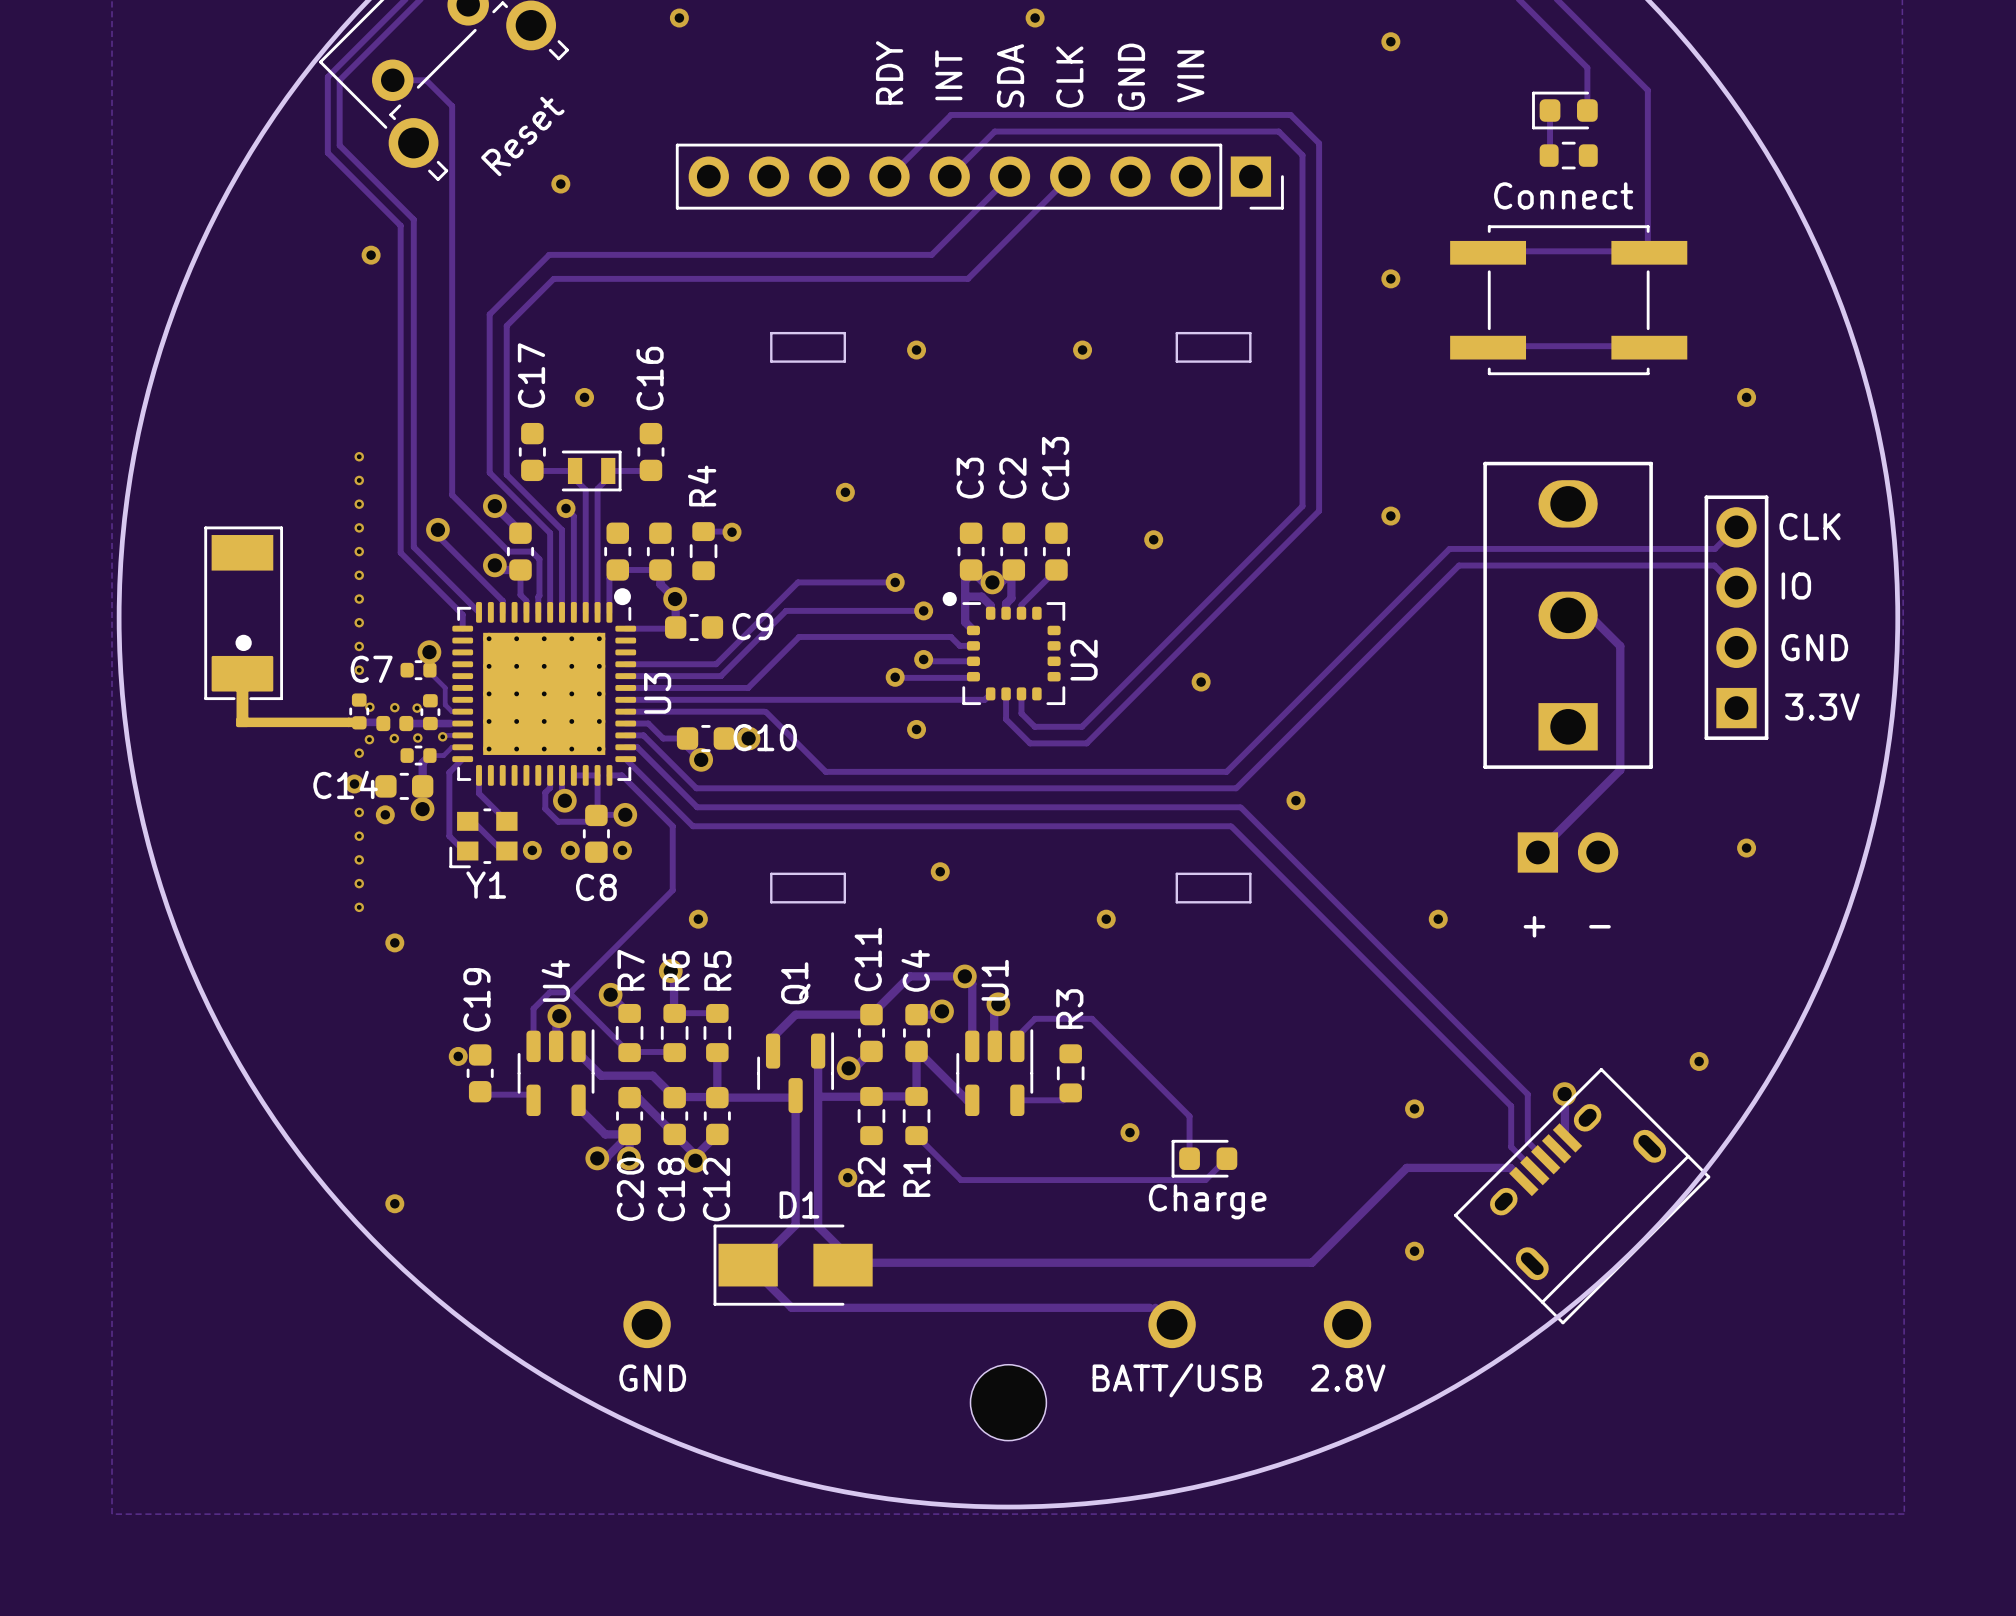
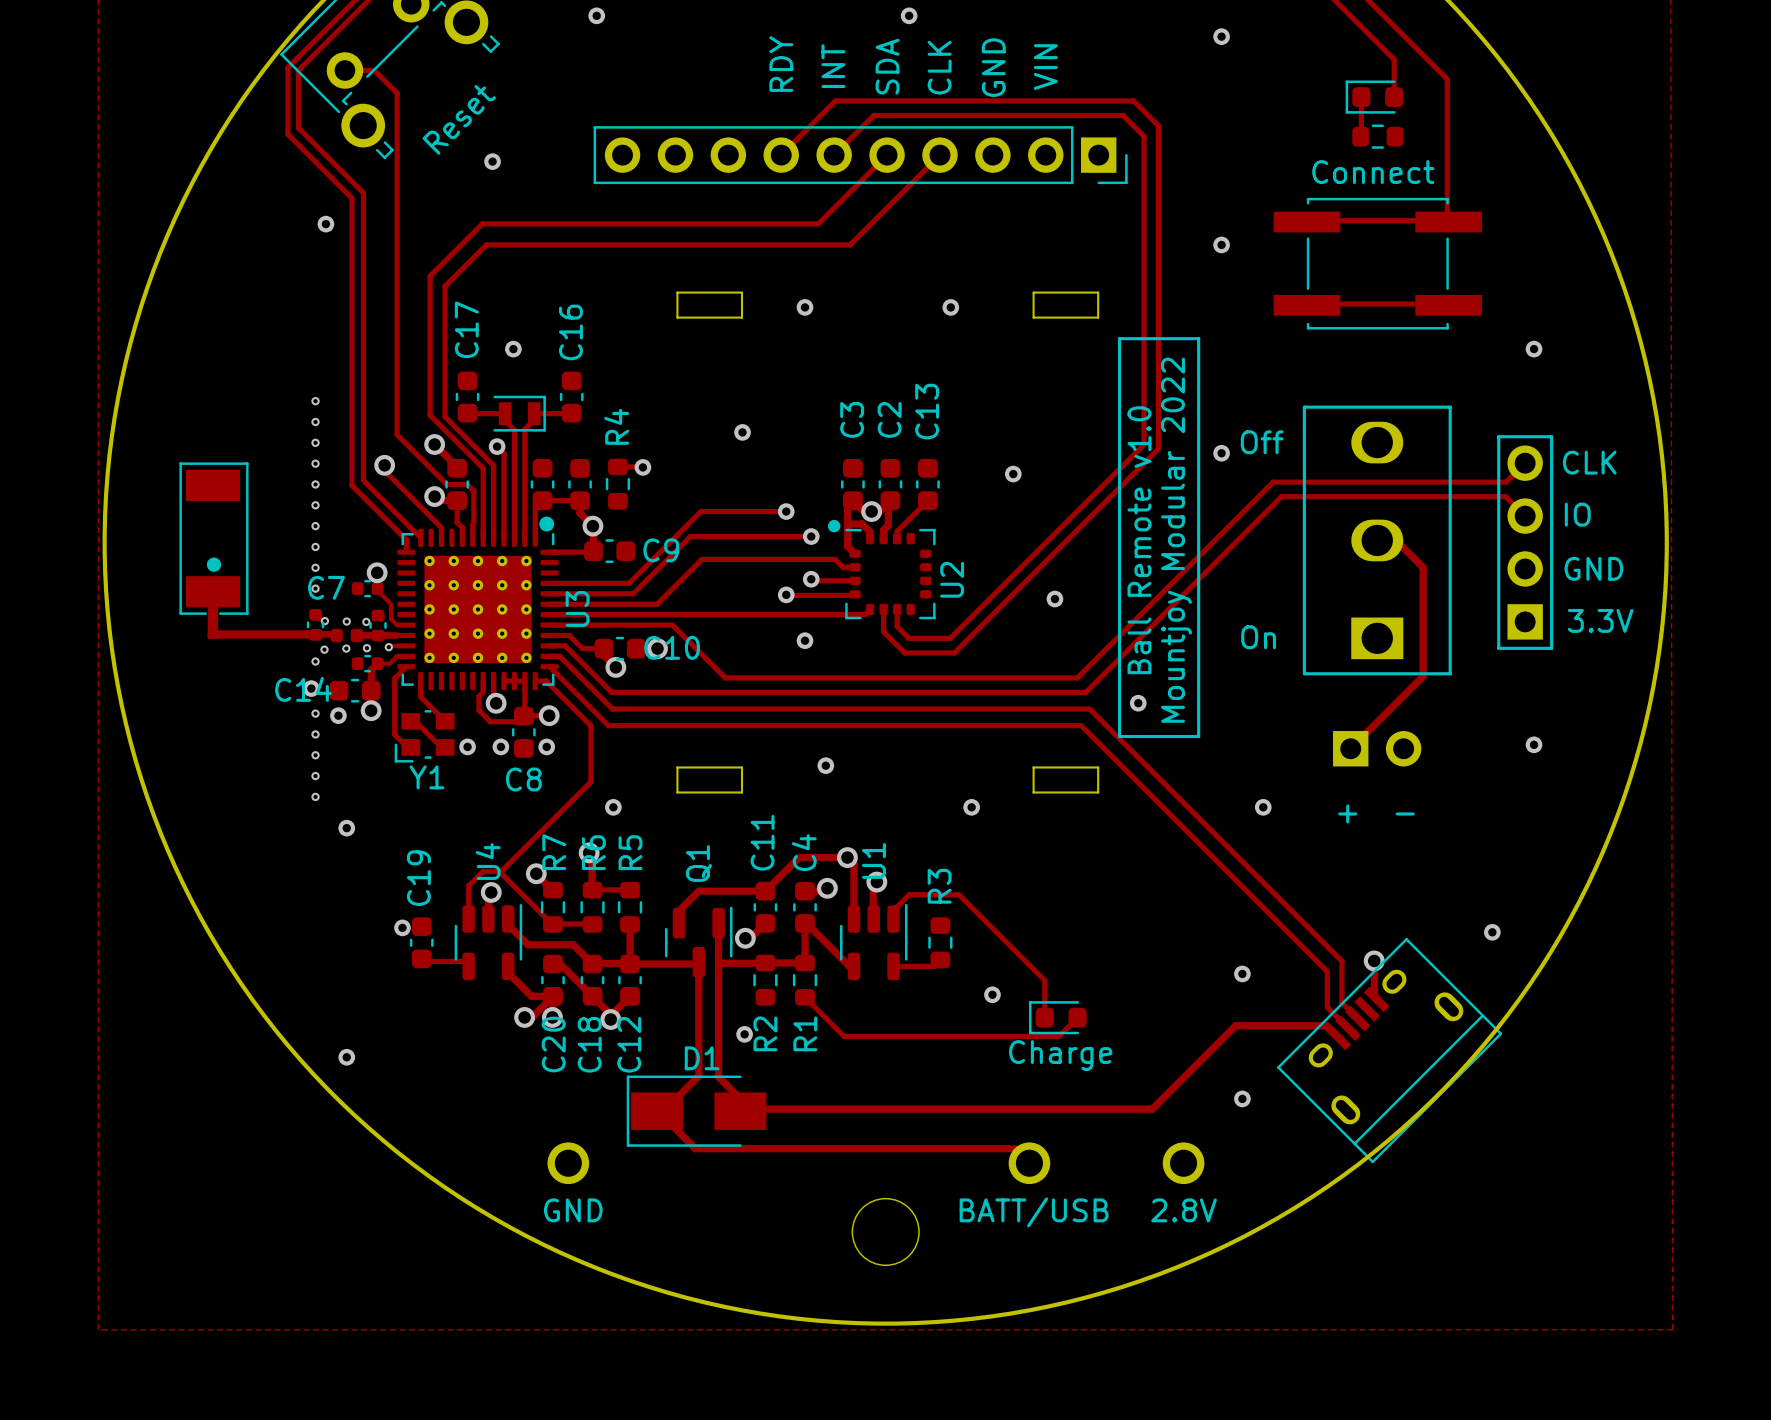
line: none -> (1119, 338) (1198, 338) (1198, 736) (1119, 736) (1119, 338)
text: none -> Off (1262, 442)
text: none -> Ball Remote v1.0 (1139, 540)
text: none -> Mountjoy Modular 2022 (1176, 540)
text: none -> On (1258, 637)

